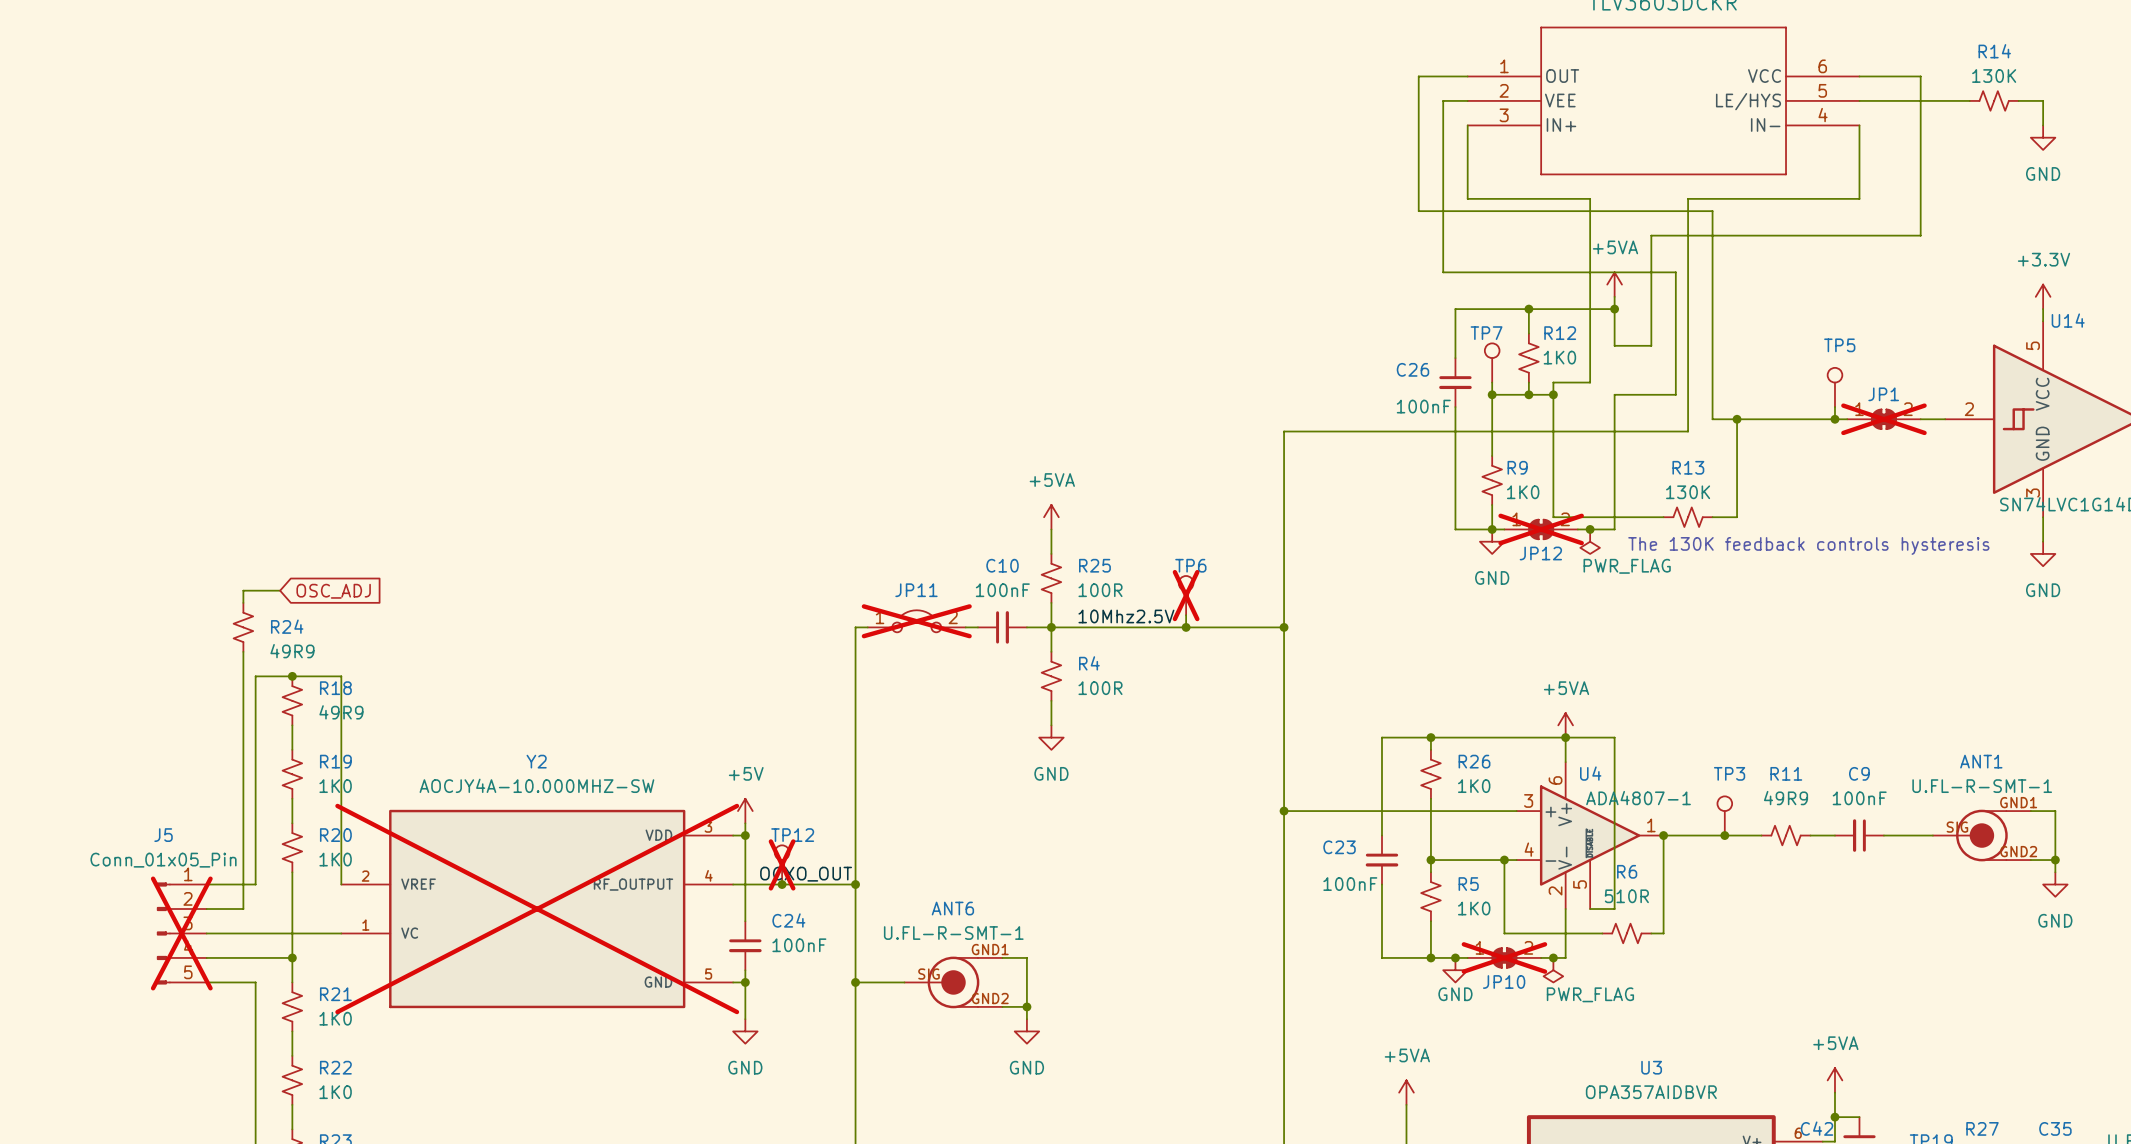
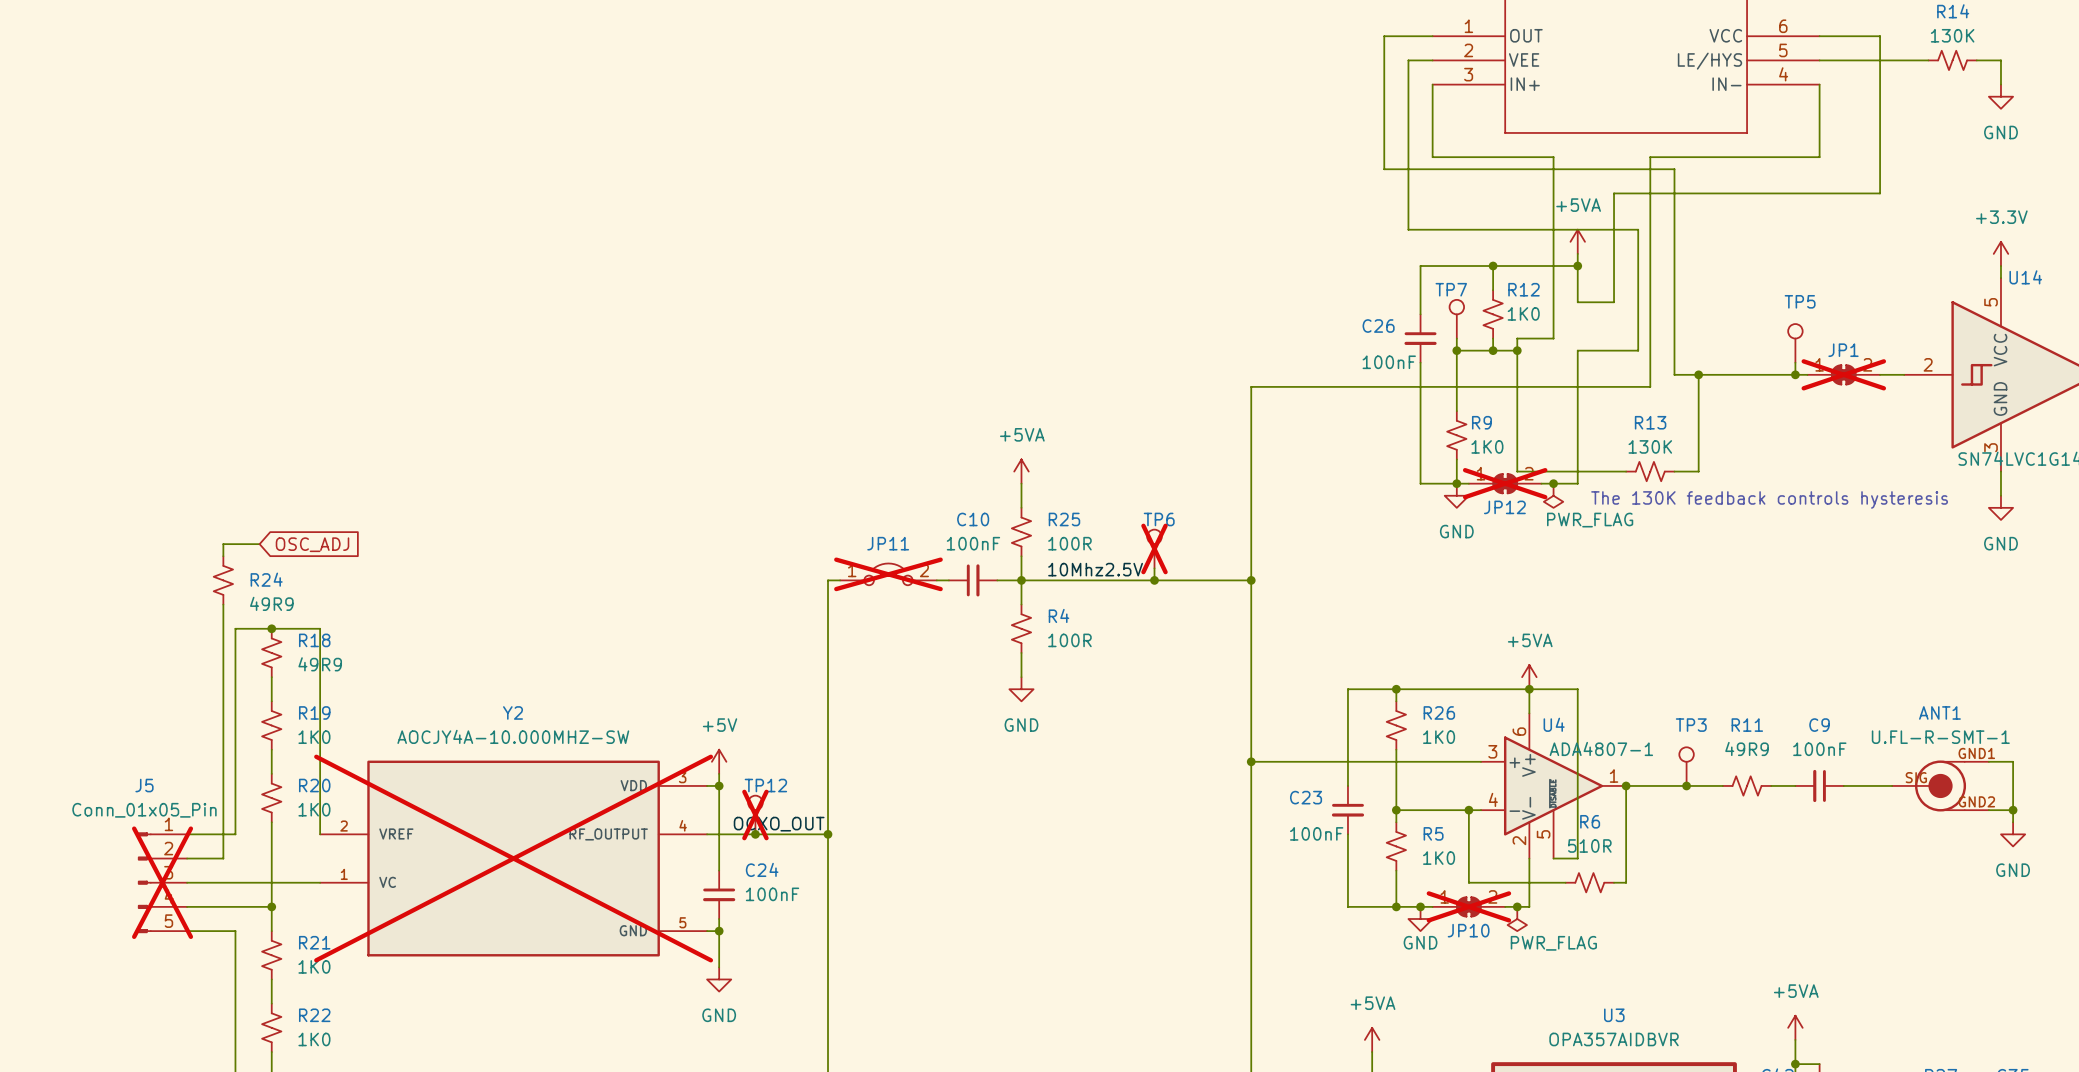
wire: (1002, 957) (1026, 957) (1026, 1019) -> none
wire: (855, 982) (904, 982) -> none
junction: (855, 982) -> none
ANT6: U.FL-R-SMT-1 (953, 982) -> none
wire: (1002, 1006) (1026, 1006) -> none
junction: (1026, 1006) -> none
power symbol: GND (1026, 1031) -> none

